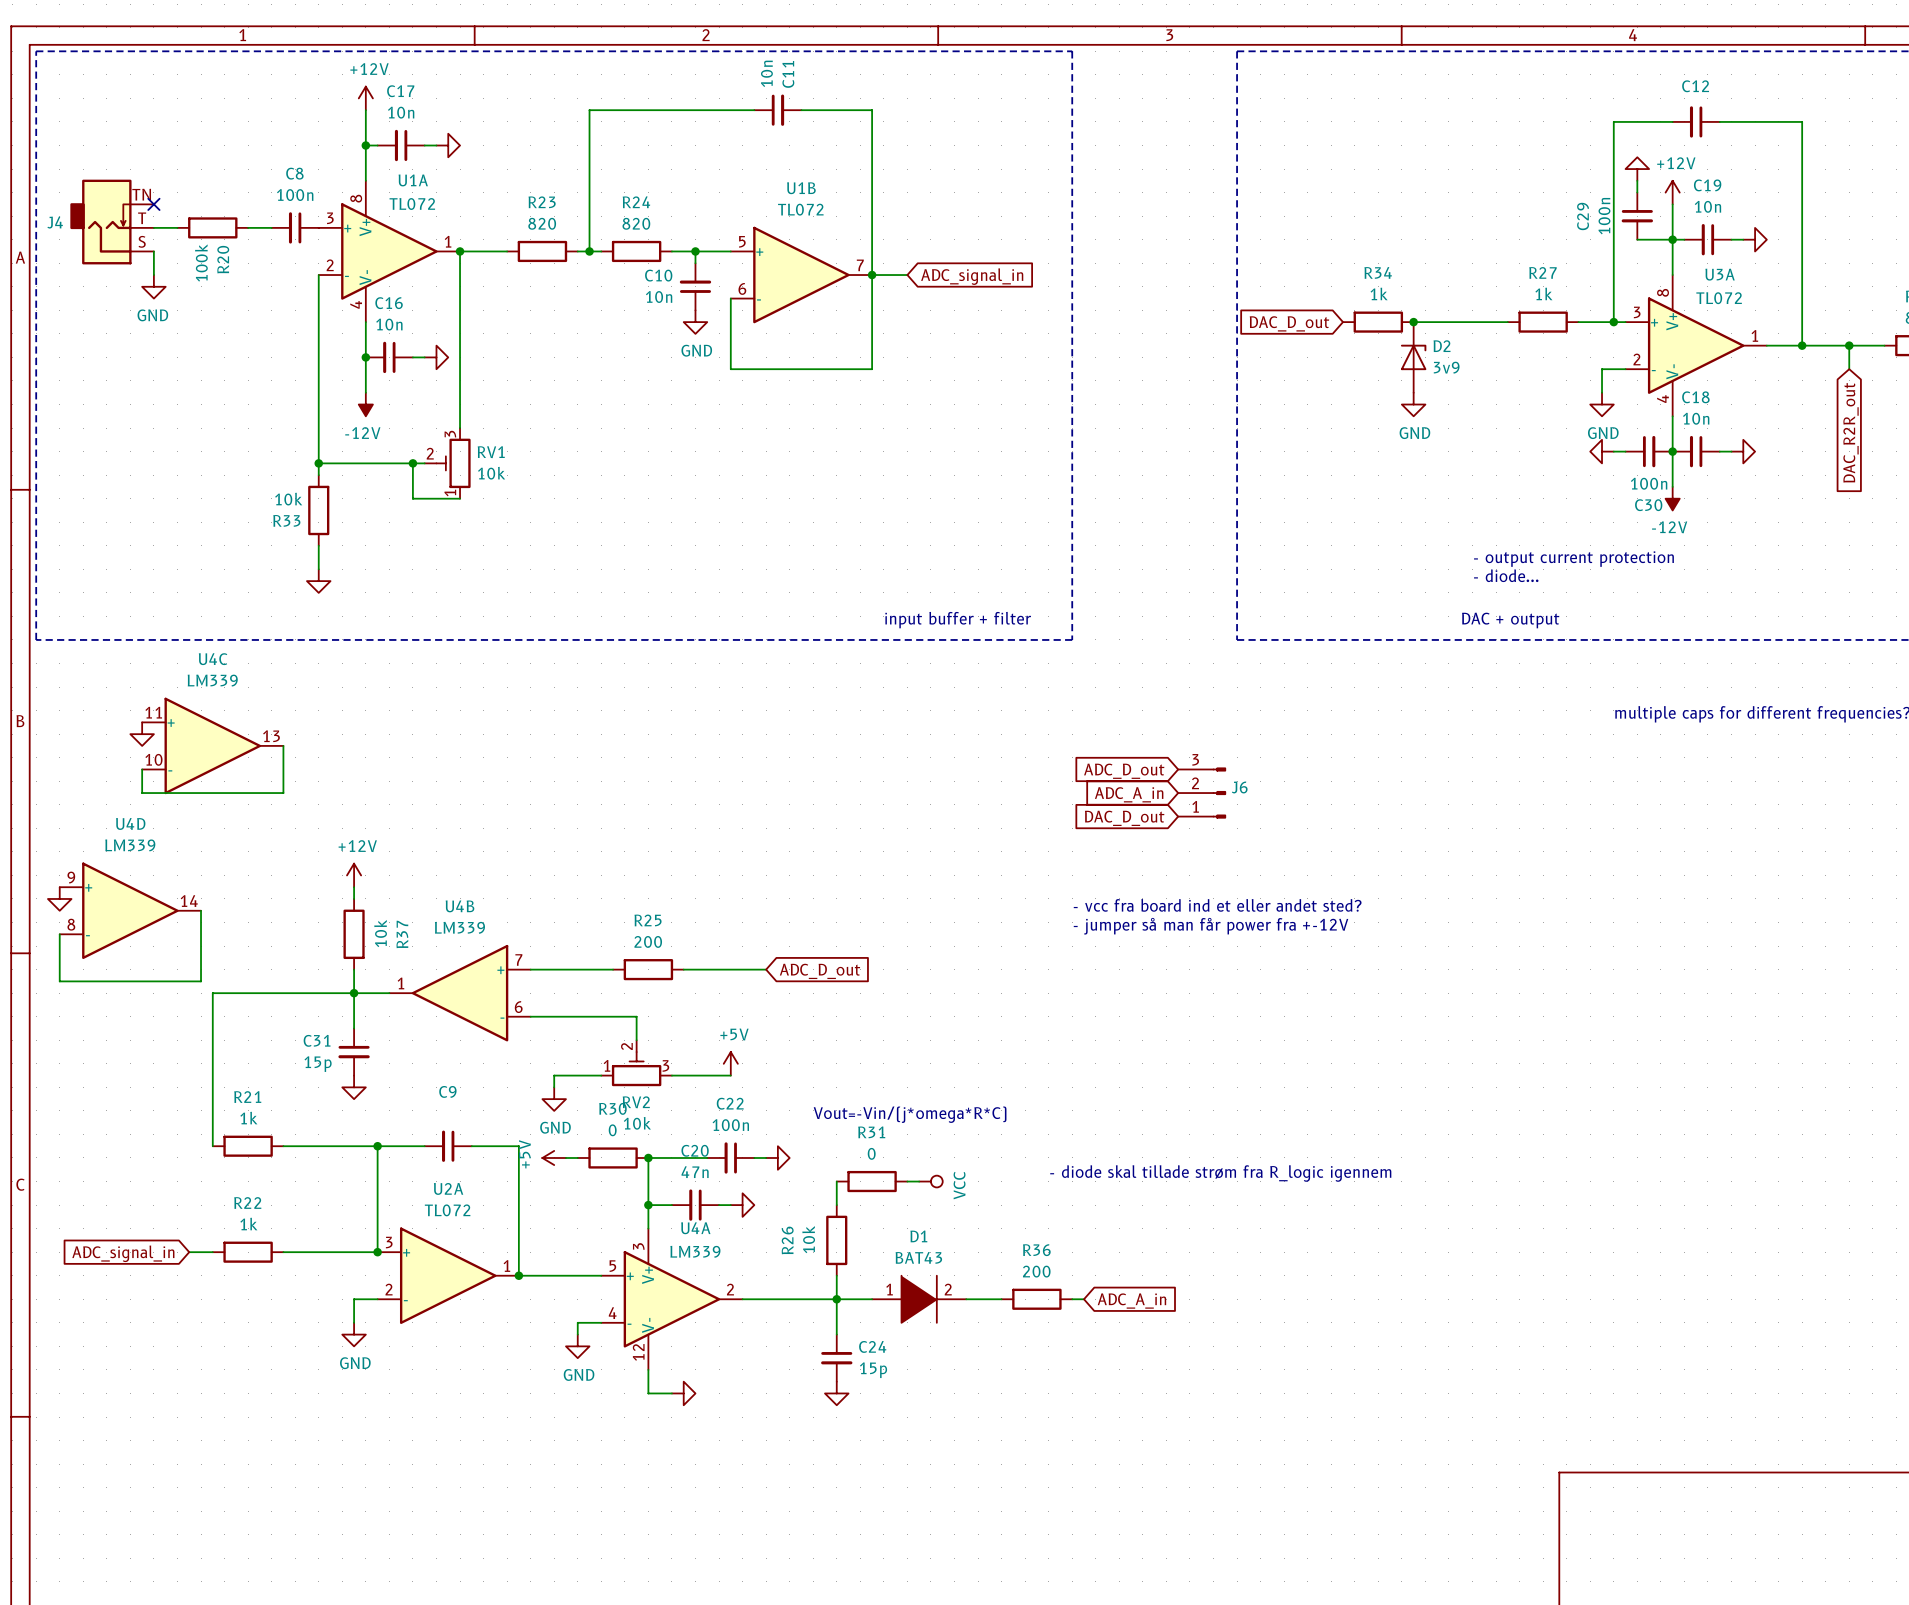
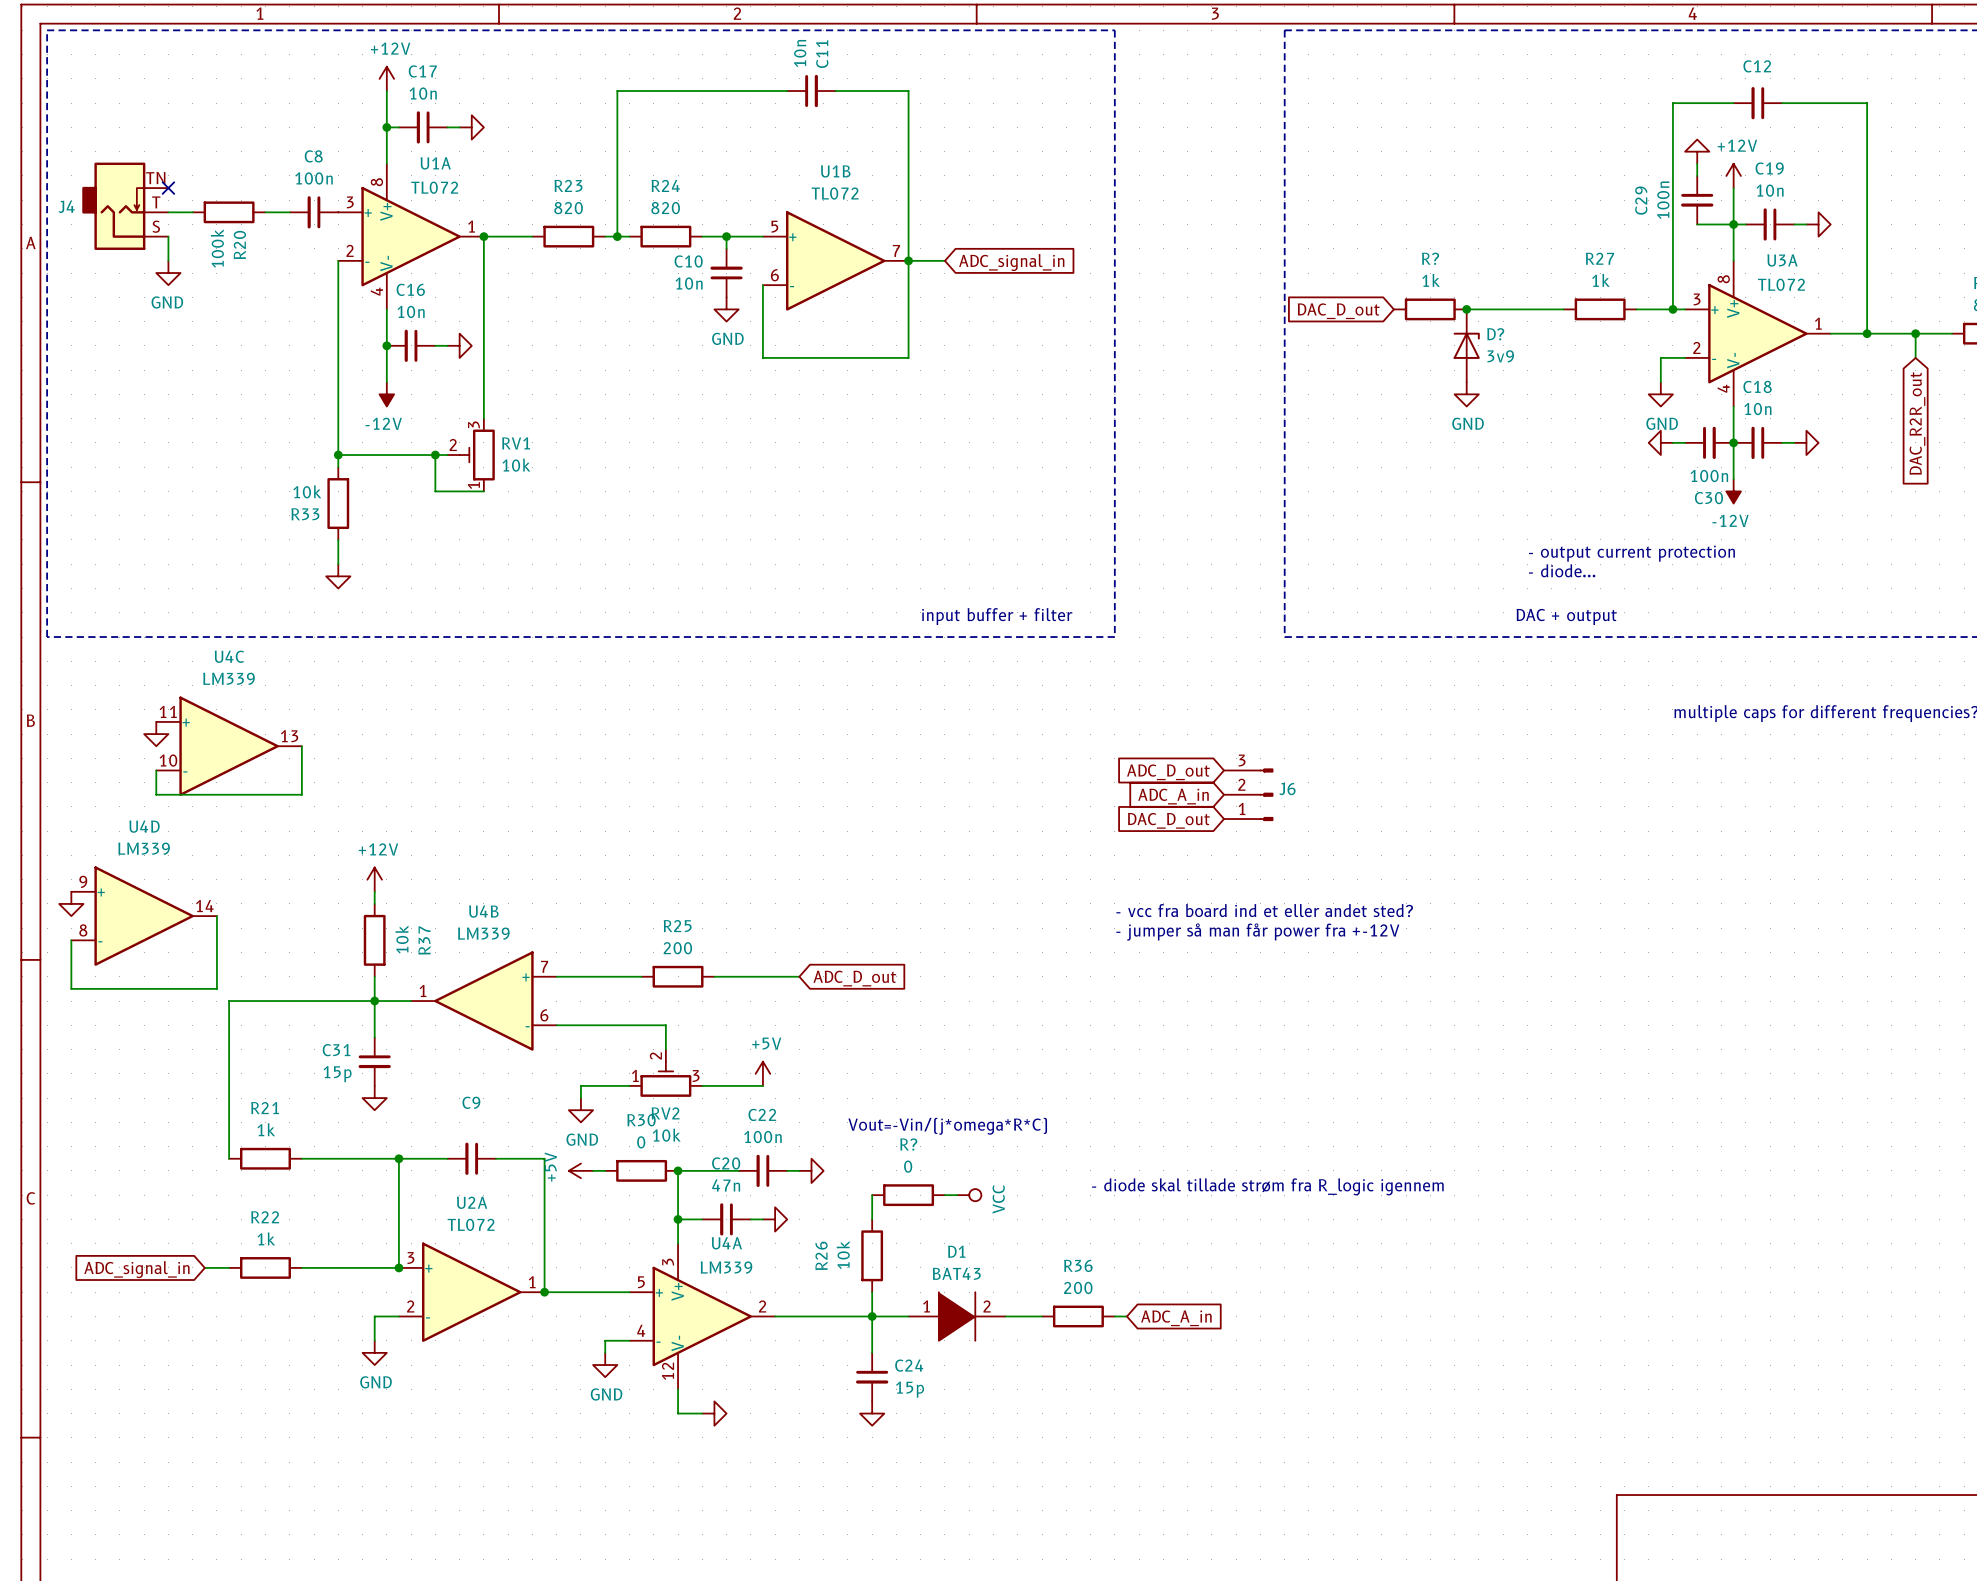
R34 name: R34 (1378, 272) -> R? (1430, 258)
D2 name: D2 (1442, 346) -> D? (1495, 334)
R31 name: R31 (871, 1132) -> R? (908, 1144)

